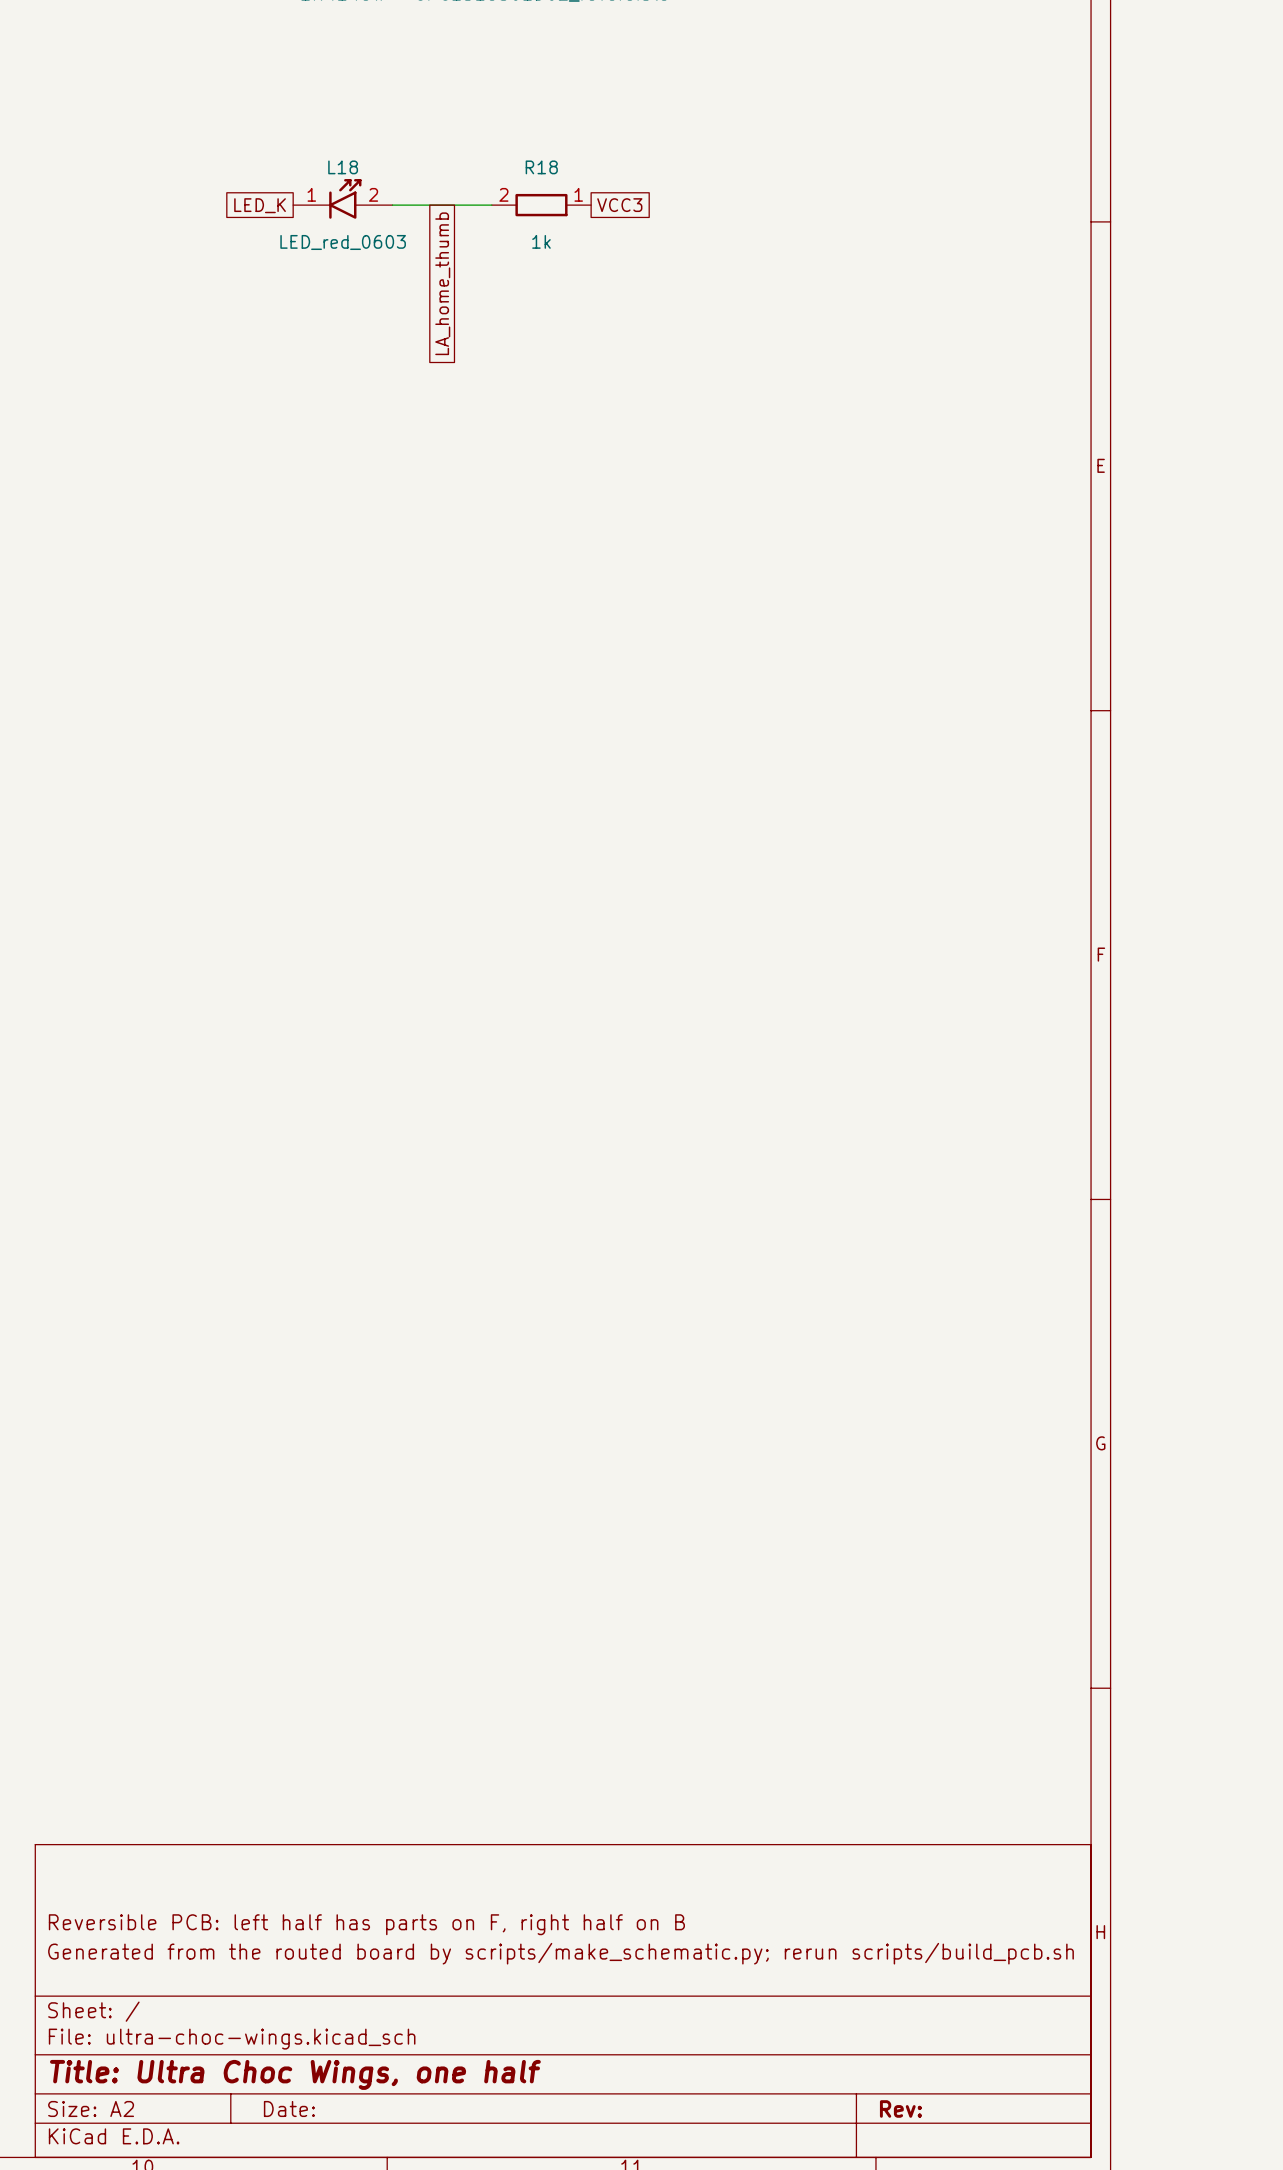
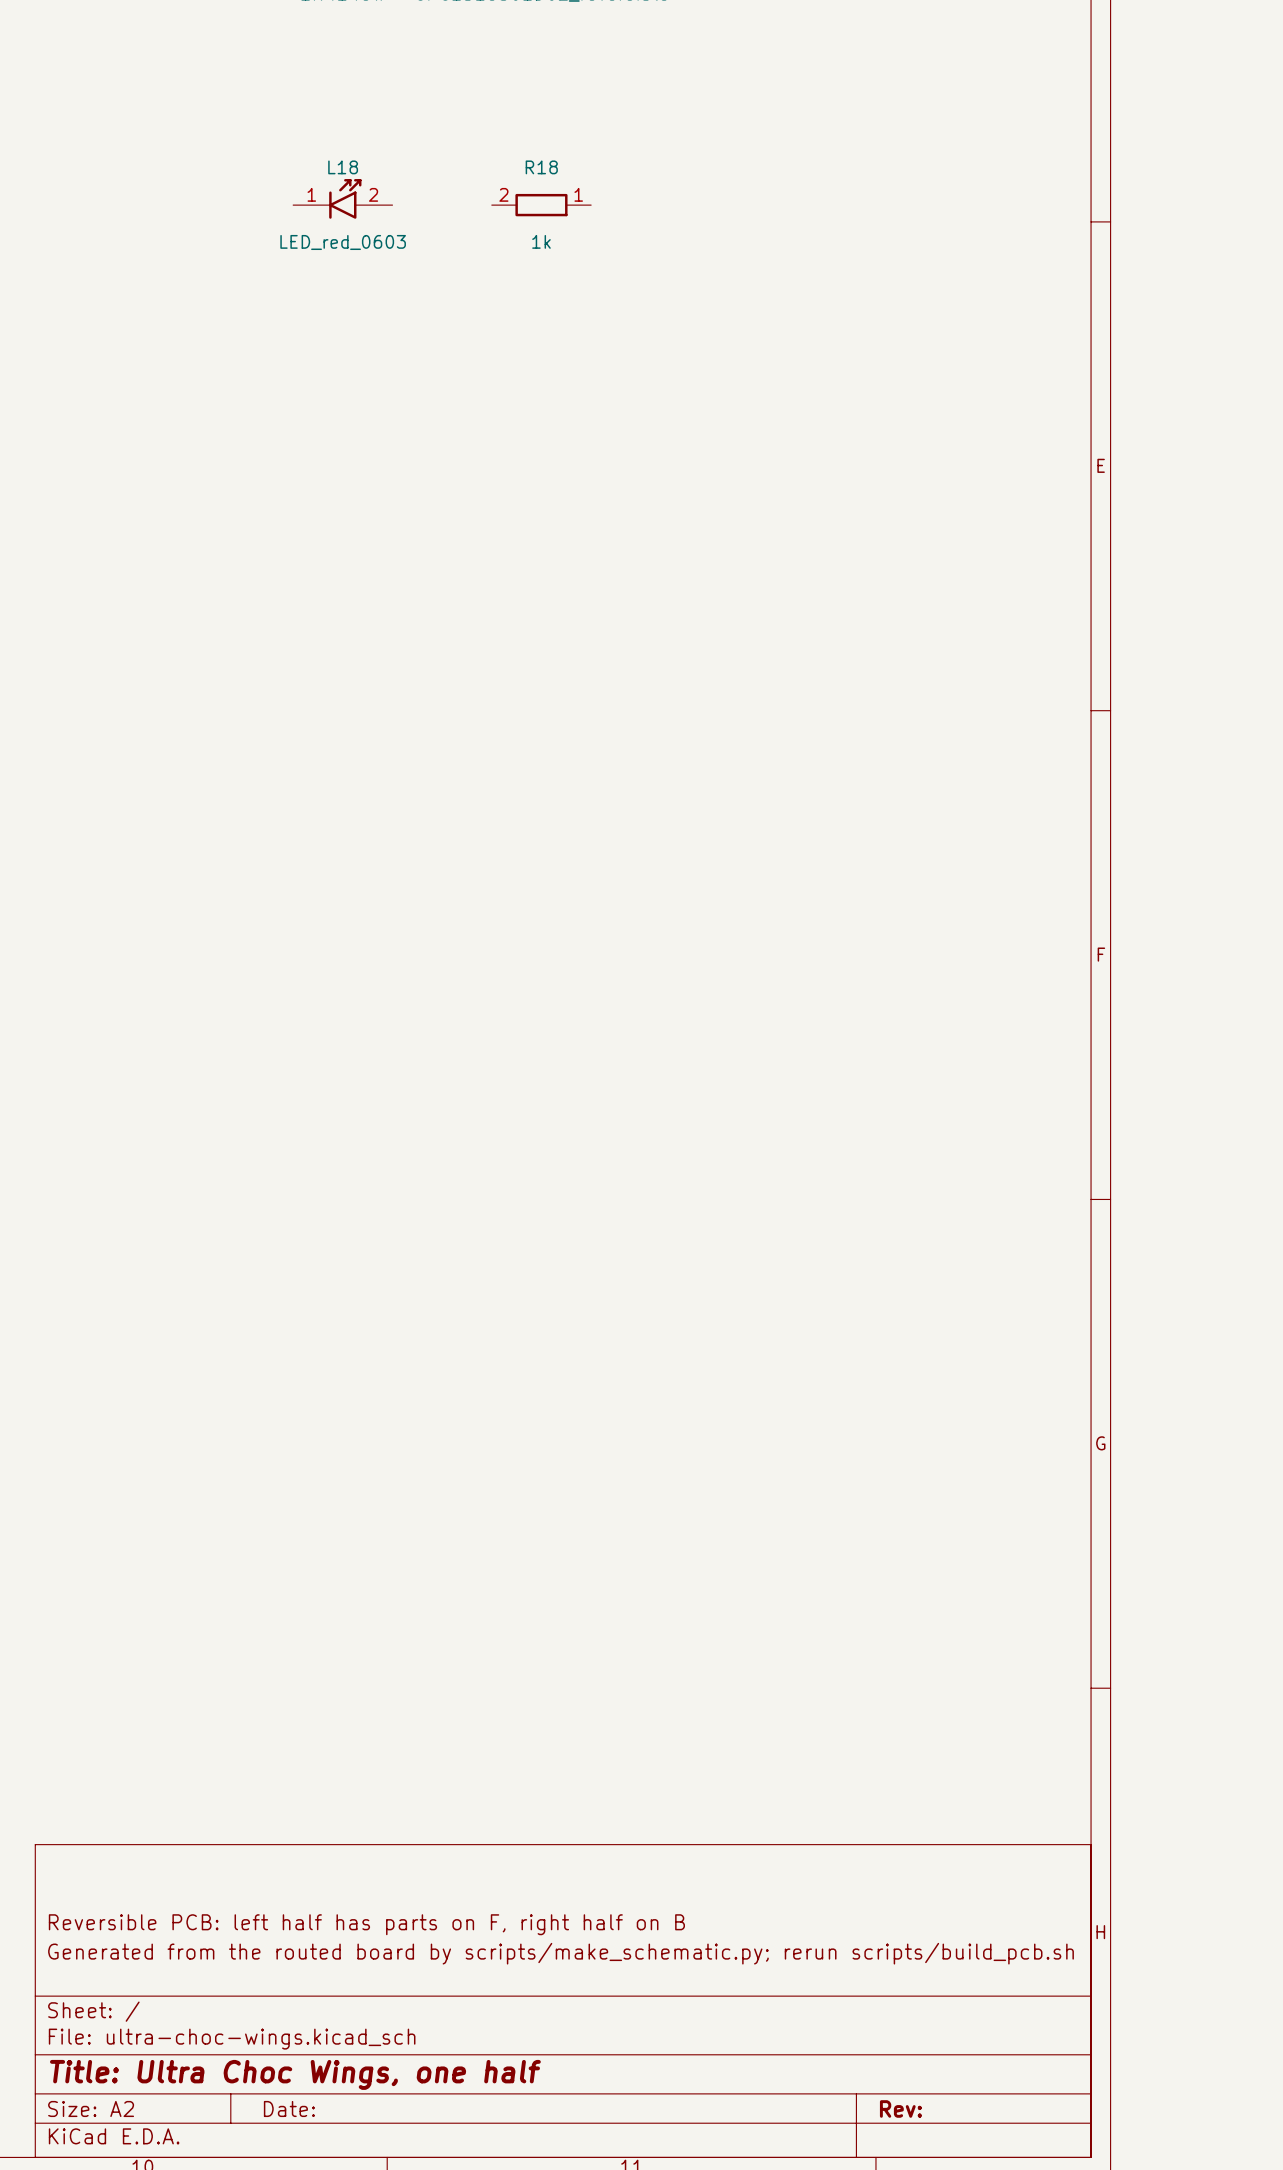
global label: LED_K (260, 205) -> none
wire: (392, 205) (491, 205) -> none
global label: VCC3 (619, 205) -> none
global label: LA_home_thumb (442, 283) -> none

